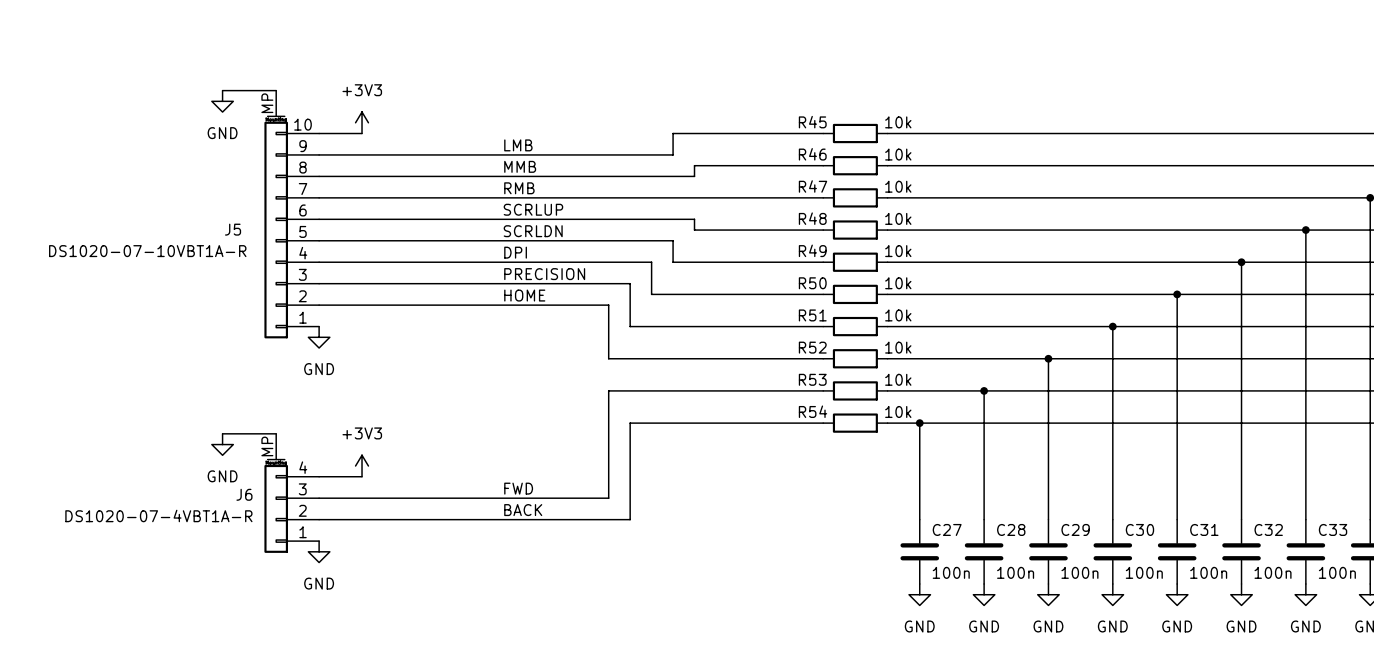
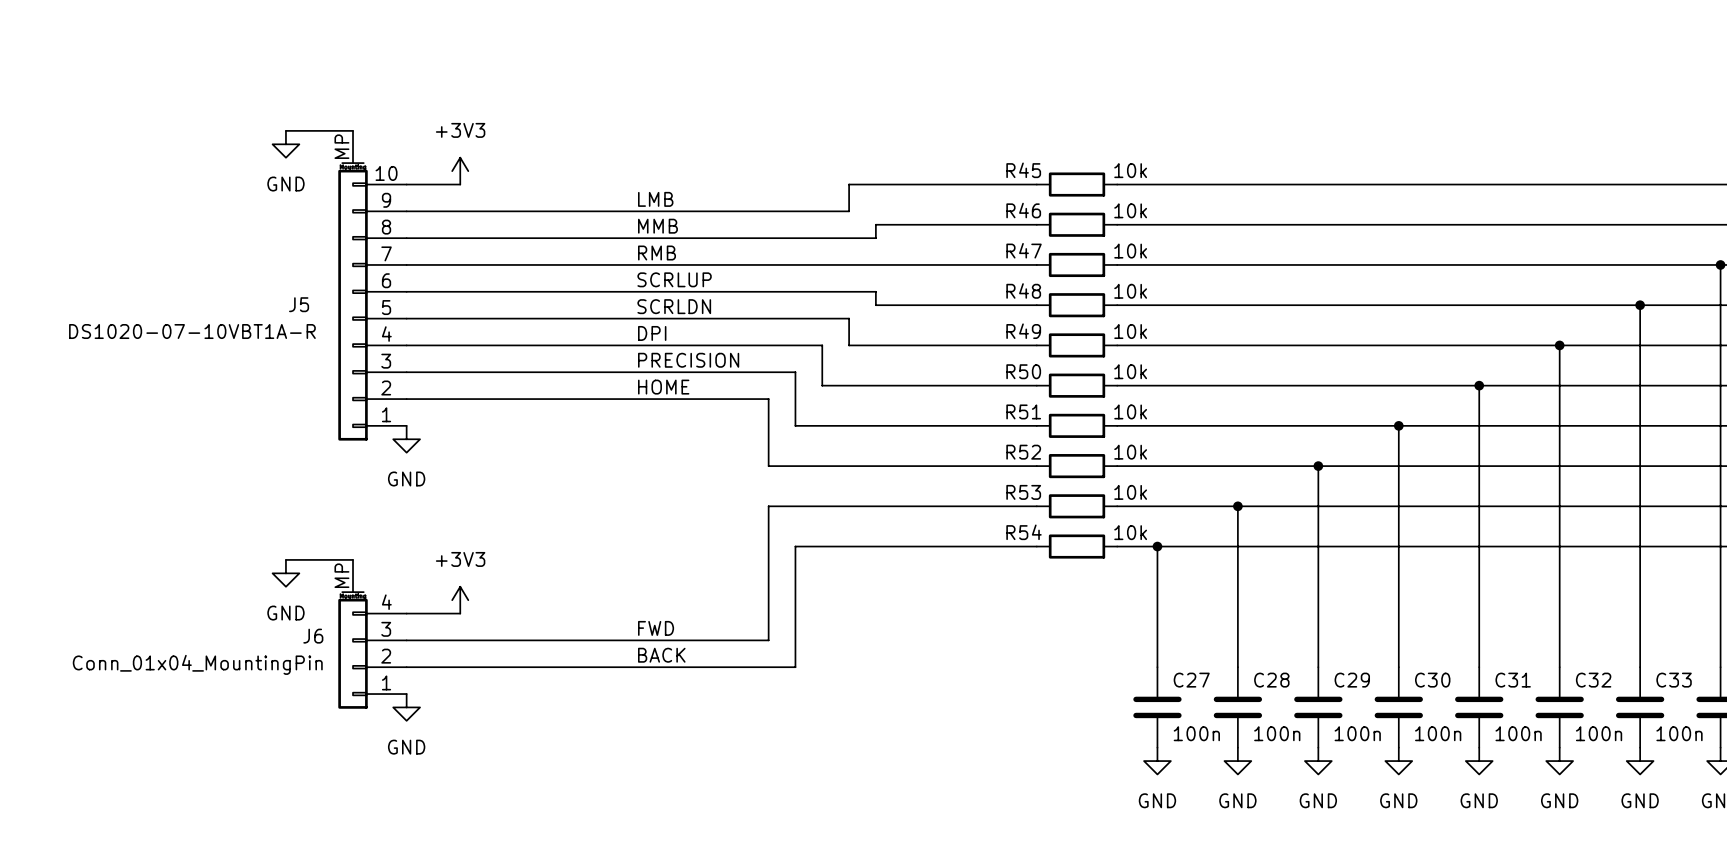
J6 value: DS1020-07-4VBT1A-R (158, 515) -> Conn_01x04_MountingPin (197, 664)

